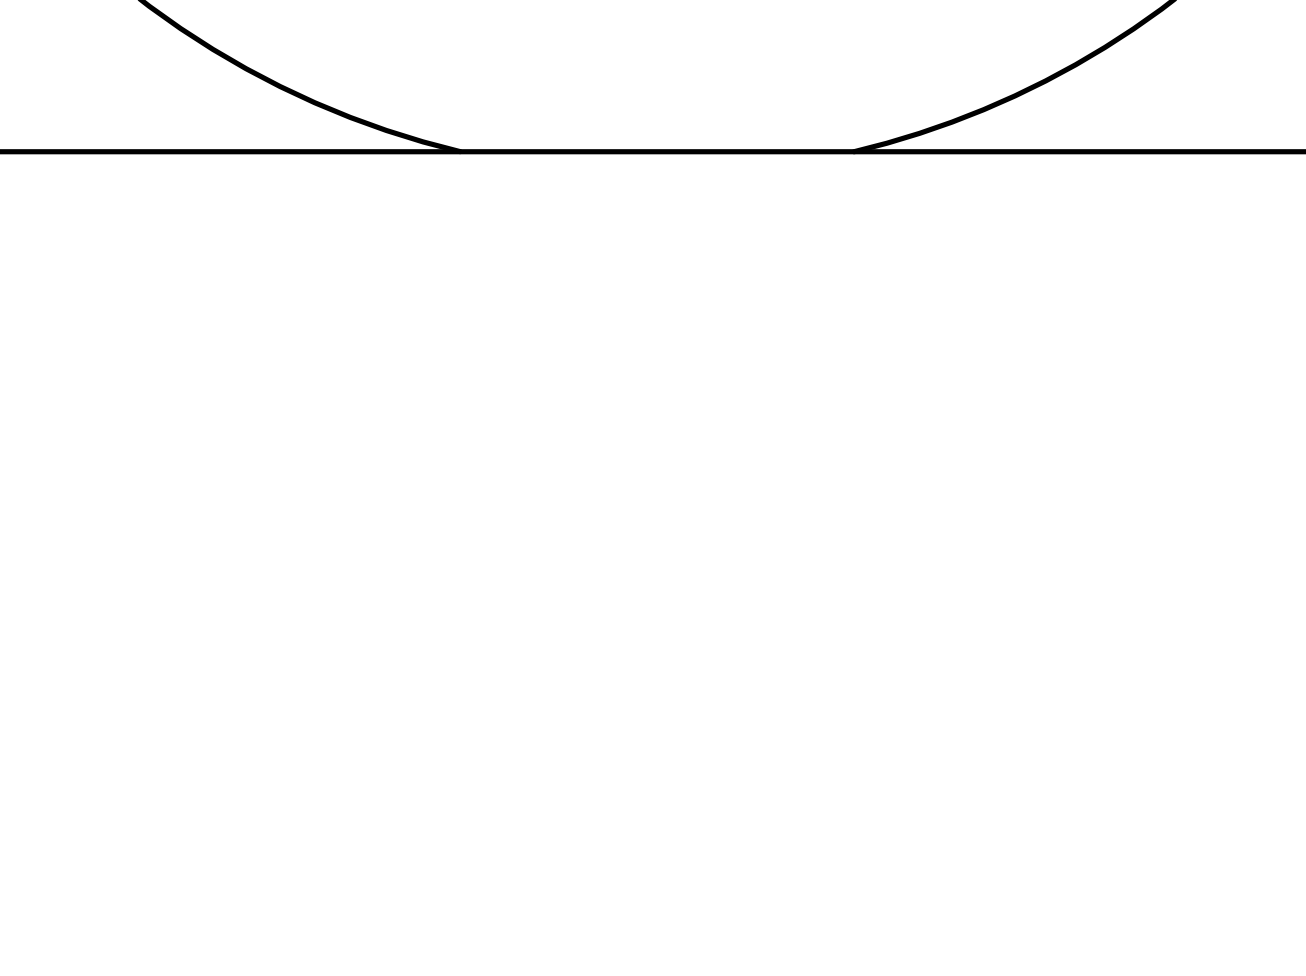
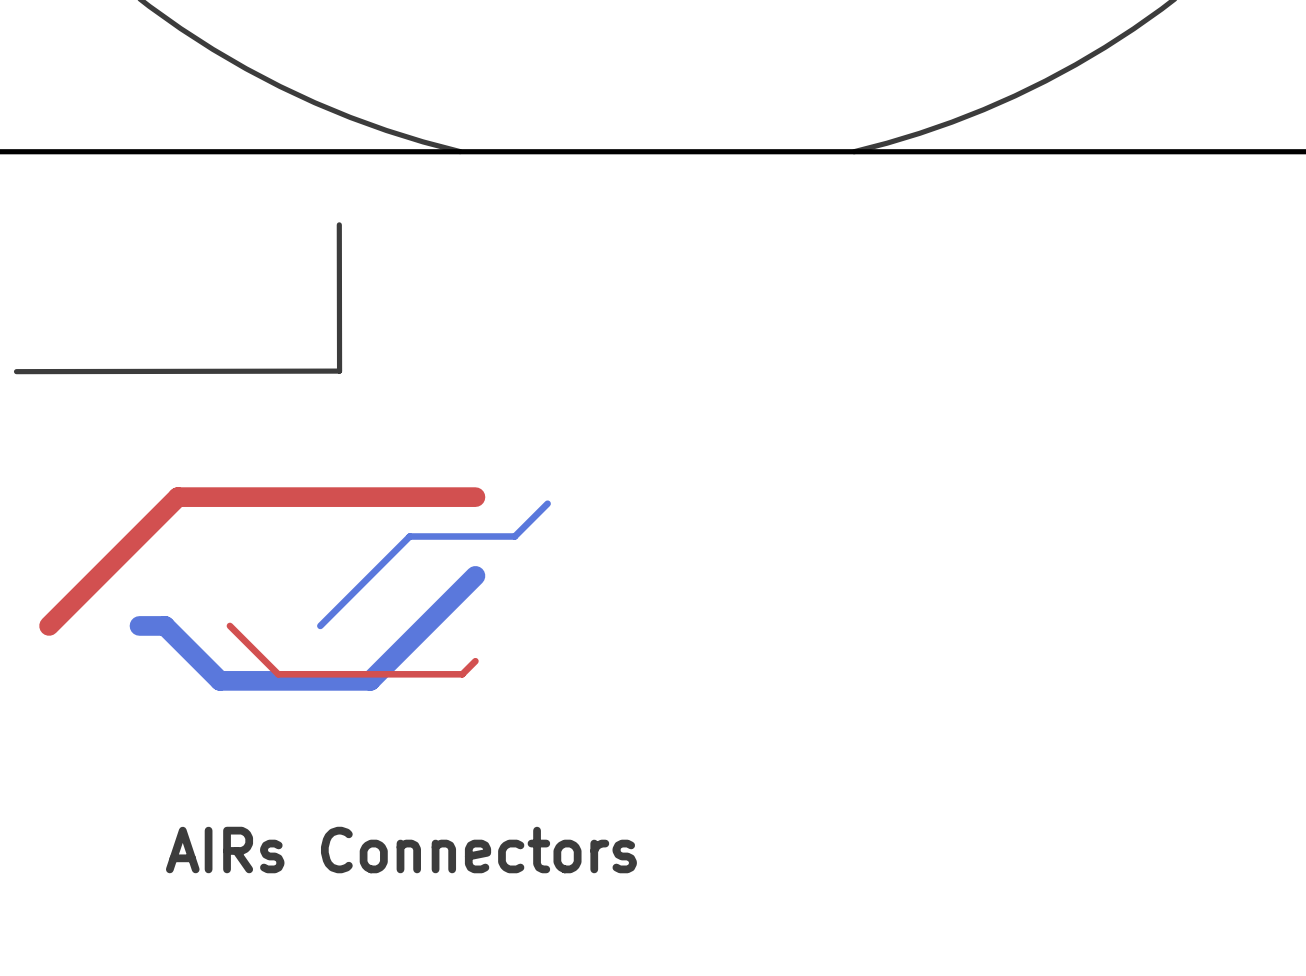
line: none -> (339, 224) (339, 371) (16, 371)
top track: none -> (475, 497) (177, 497) (49, 625)
bottom track: none -> (547, 503) (514, 536) (409, 536) (320, 625)
bottom track: none -> (475, 575) (370, 680) (219, 680) (165, 625) (139, 625)
top track: none -> (229, 625) (278, 674) (462, 674) (475, 661)
text: none -> AIRs Connectors (401, 850)

